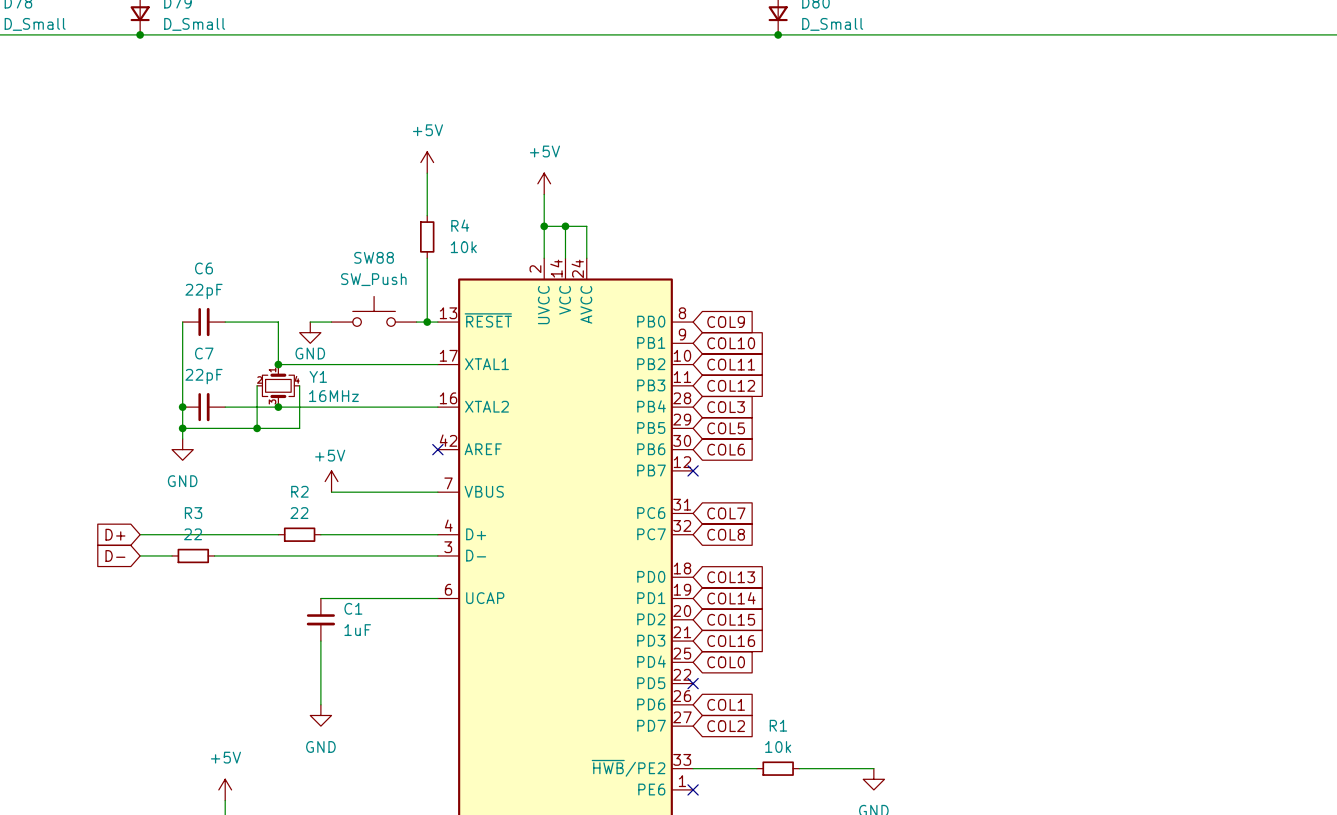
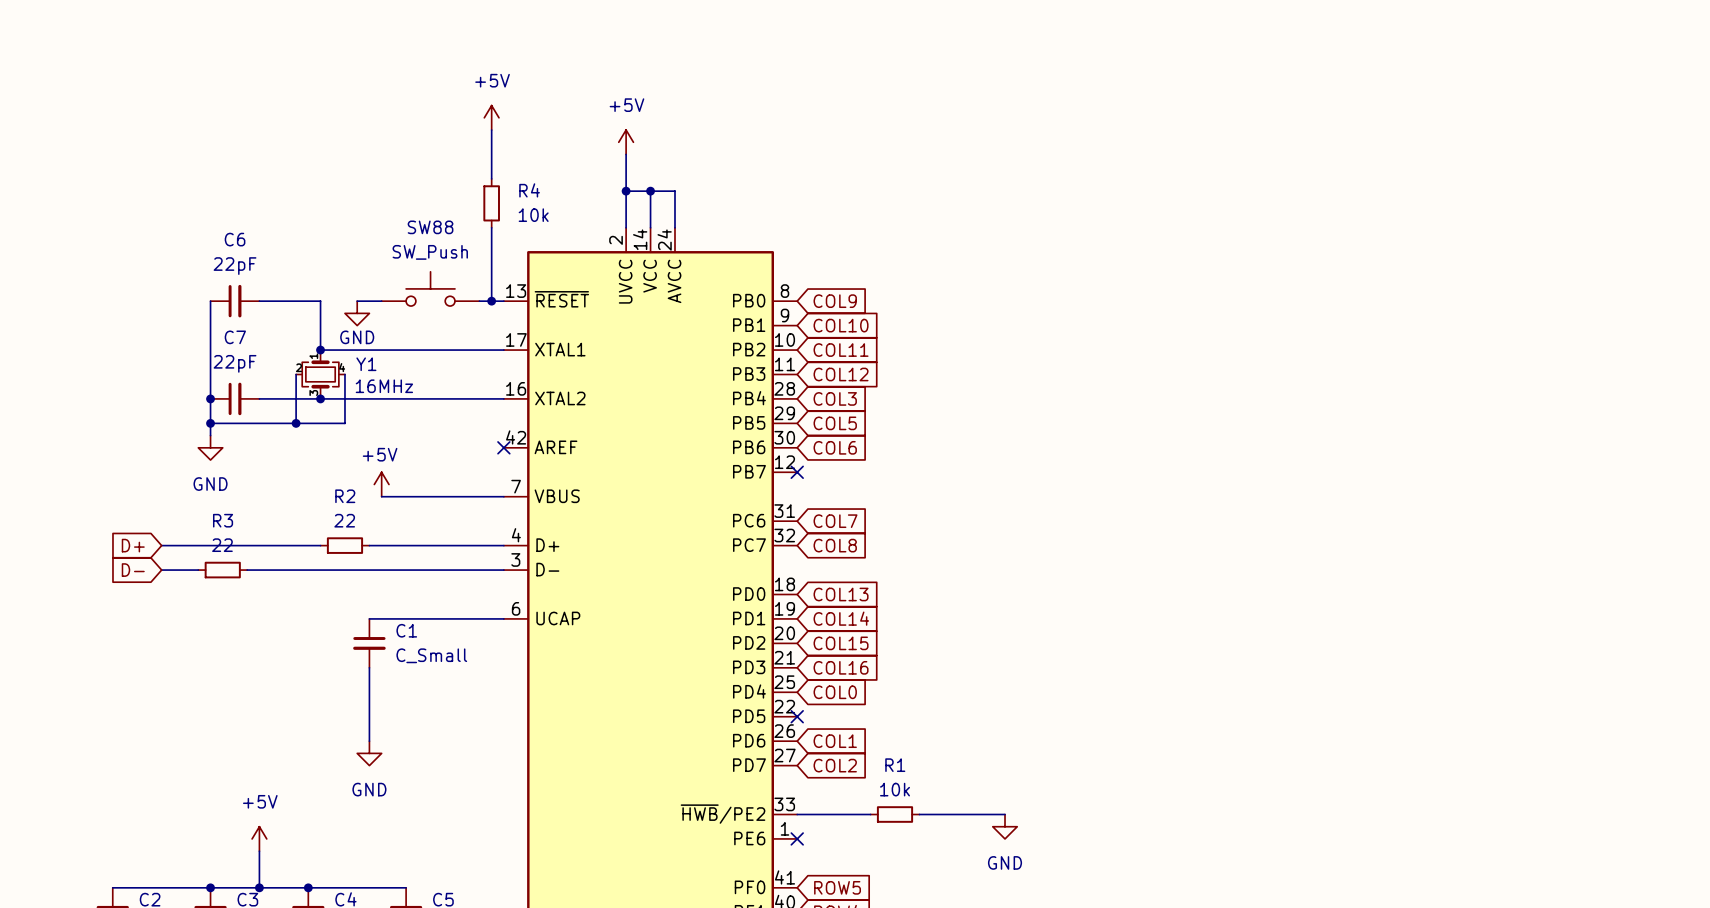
C1 value: 1uF (357, 630) -> C_Small (431, 655)

